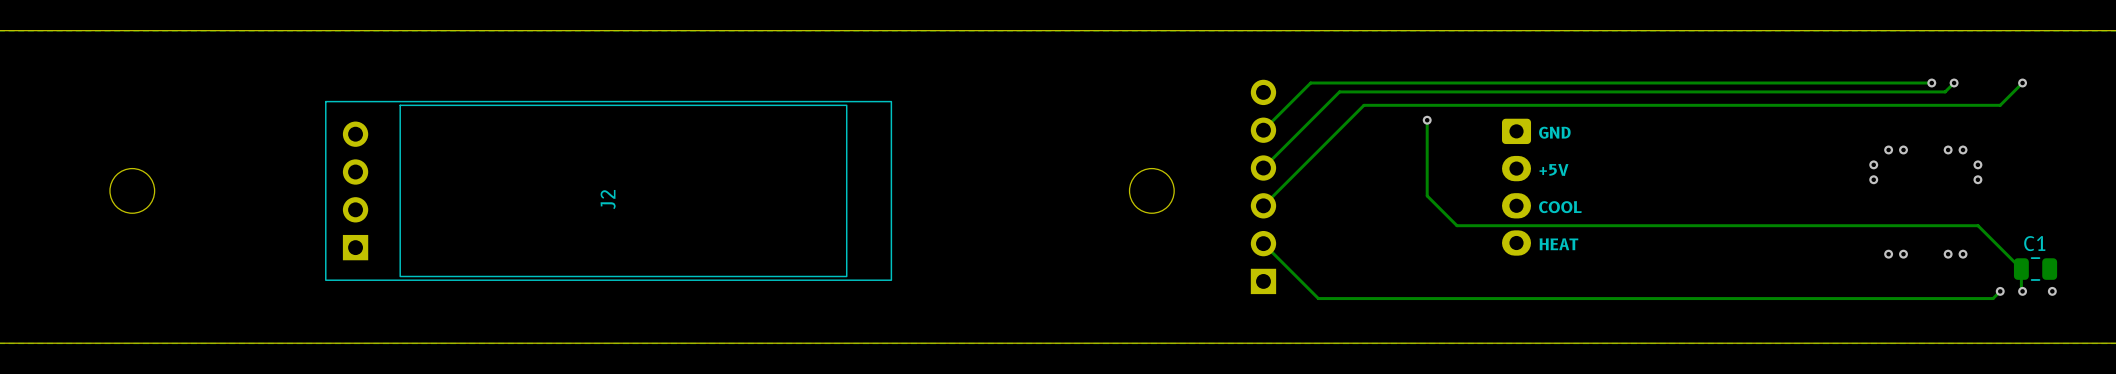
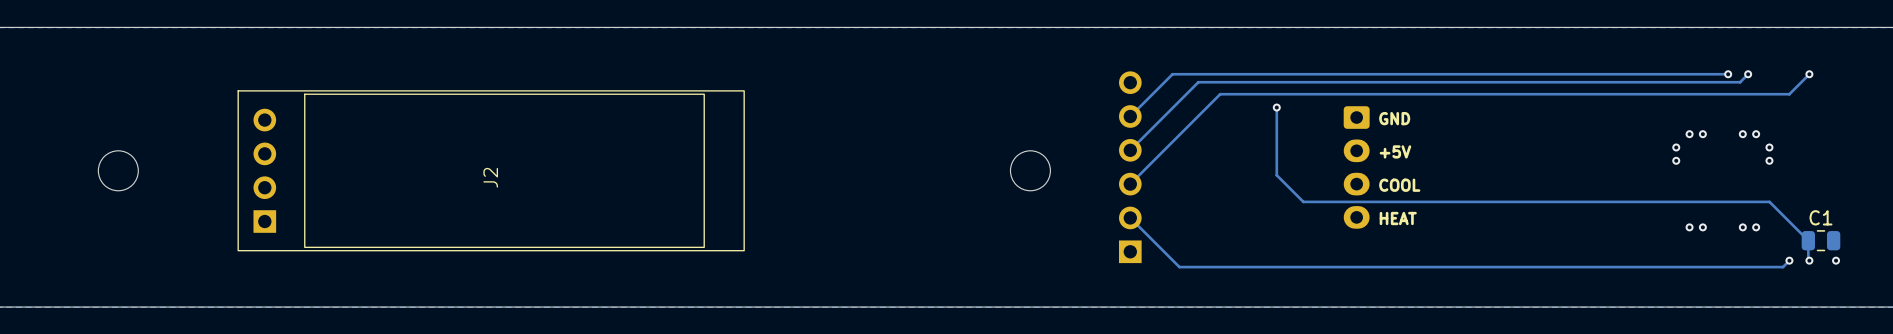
J2 position: (608, 190) -> (491, 170)

